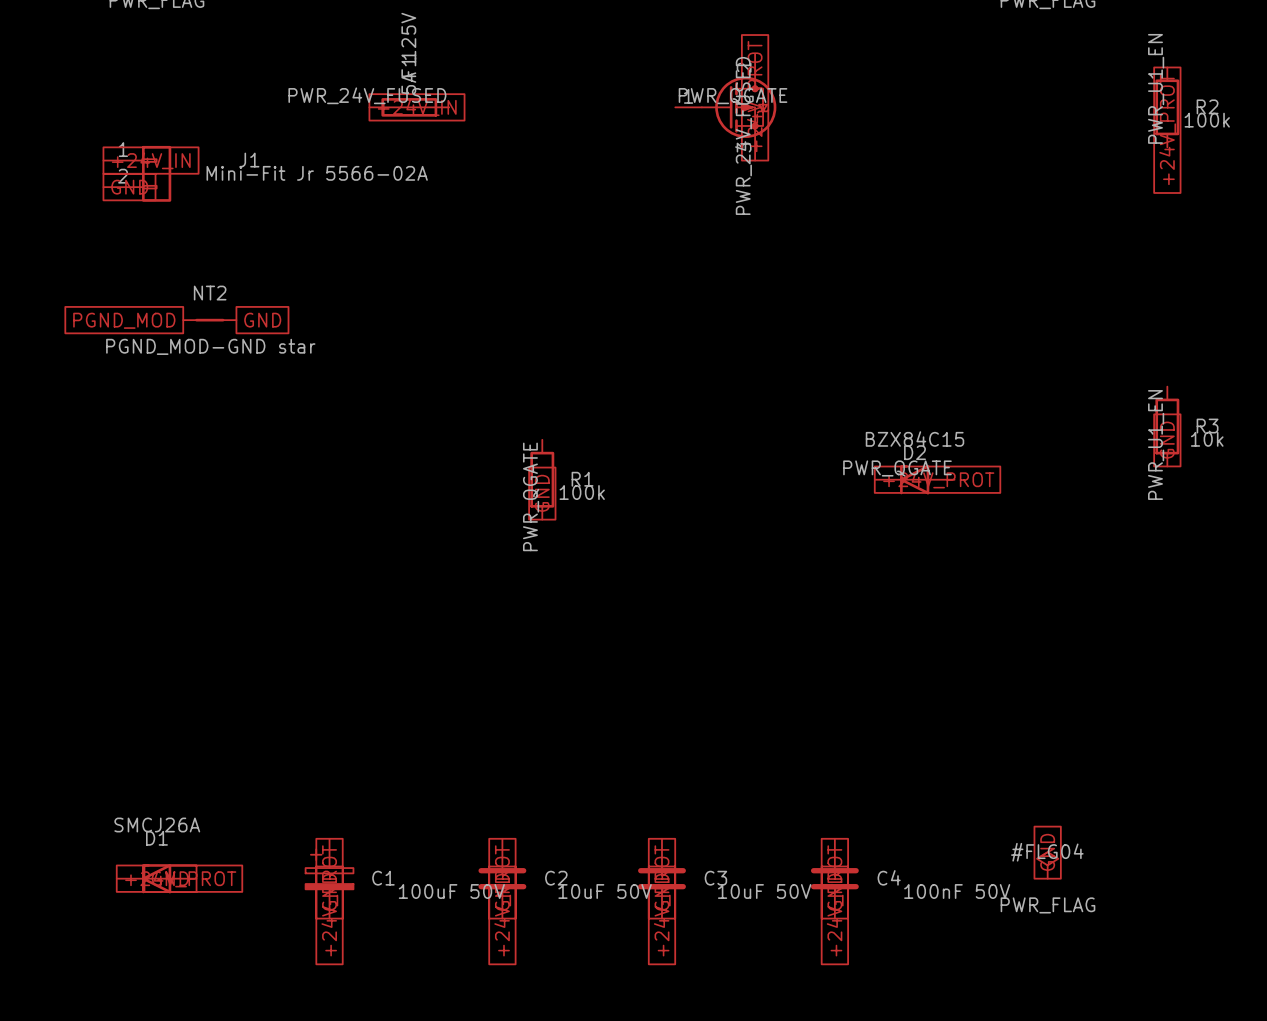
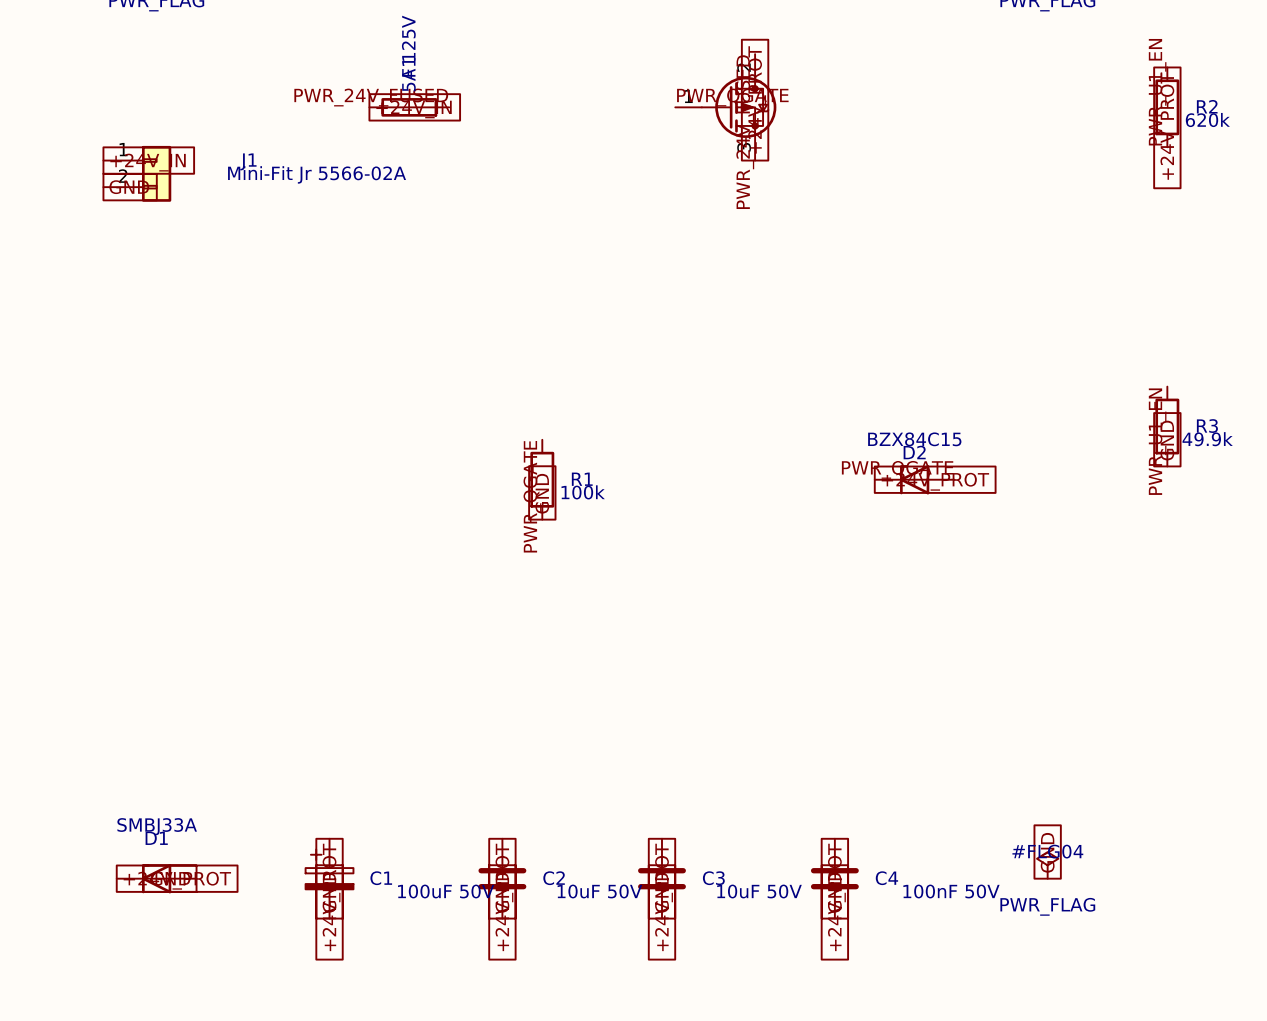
R2 value: 100k (1207, 120) -> 620k (1207, 120)
global label: PGND_MOD (124, 320) -> none
NT2: PGND_MOD-GND star (209, 320) -> none
global label: GND (262, 320) -> none
R3 value: 10k (1207, 439) -> 49.9k (1207, 439)
D1 value: SMCJ26A (157, 825) -> SMBJ33A (157, 826)

